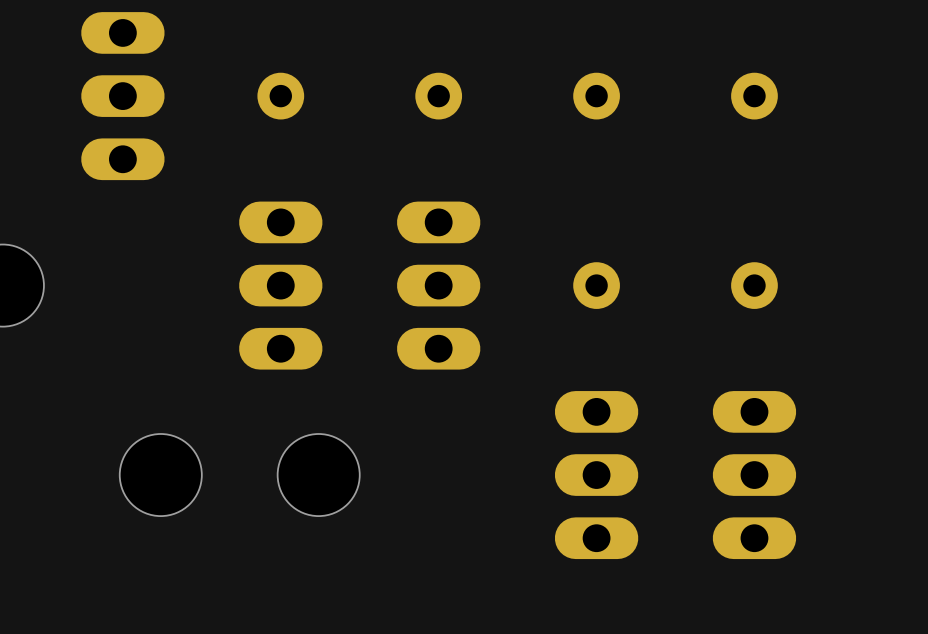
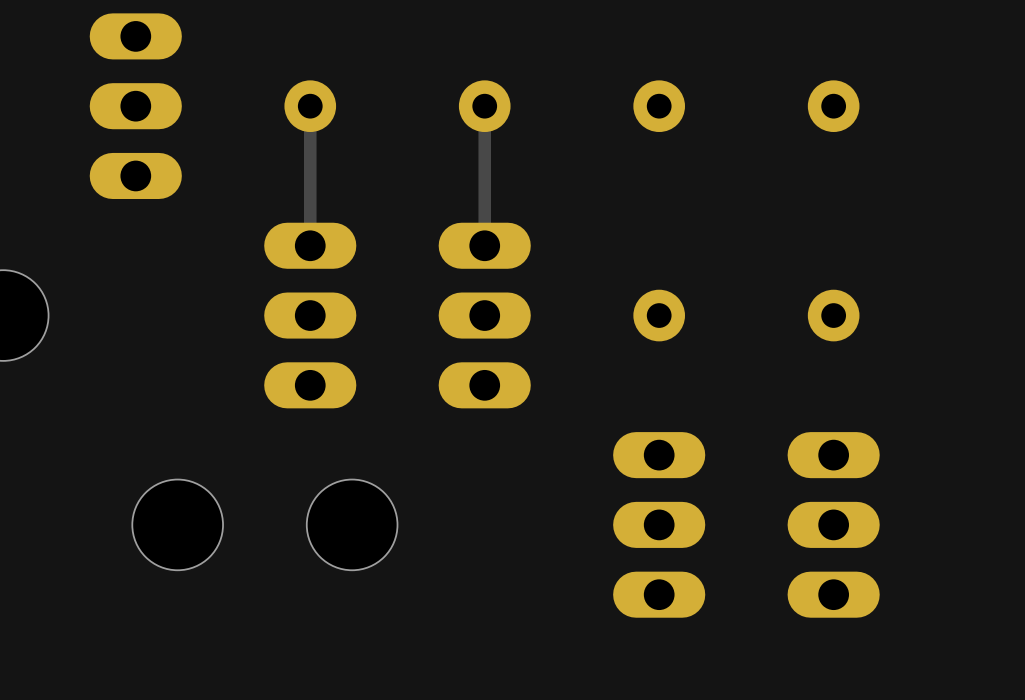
track: none -> (310, 106) (310, 245)
track: none -> (484, 106) (484, 245)

